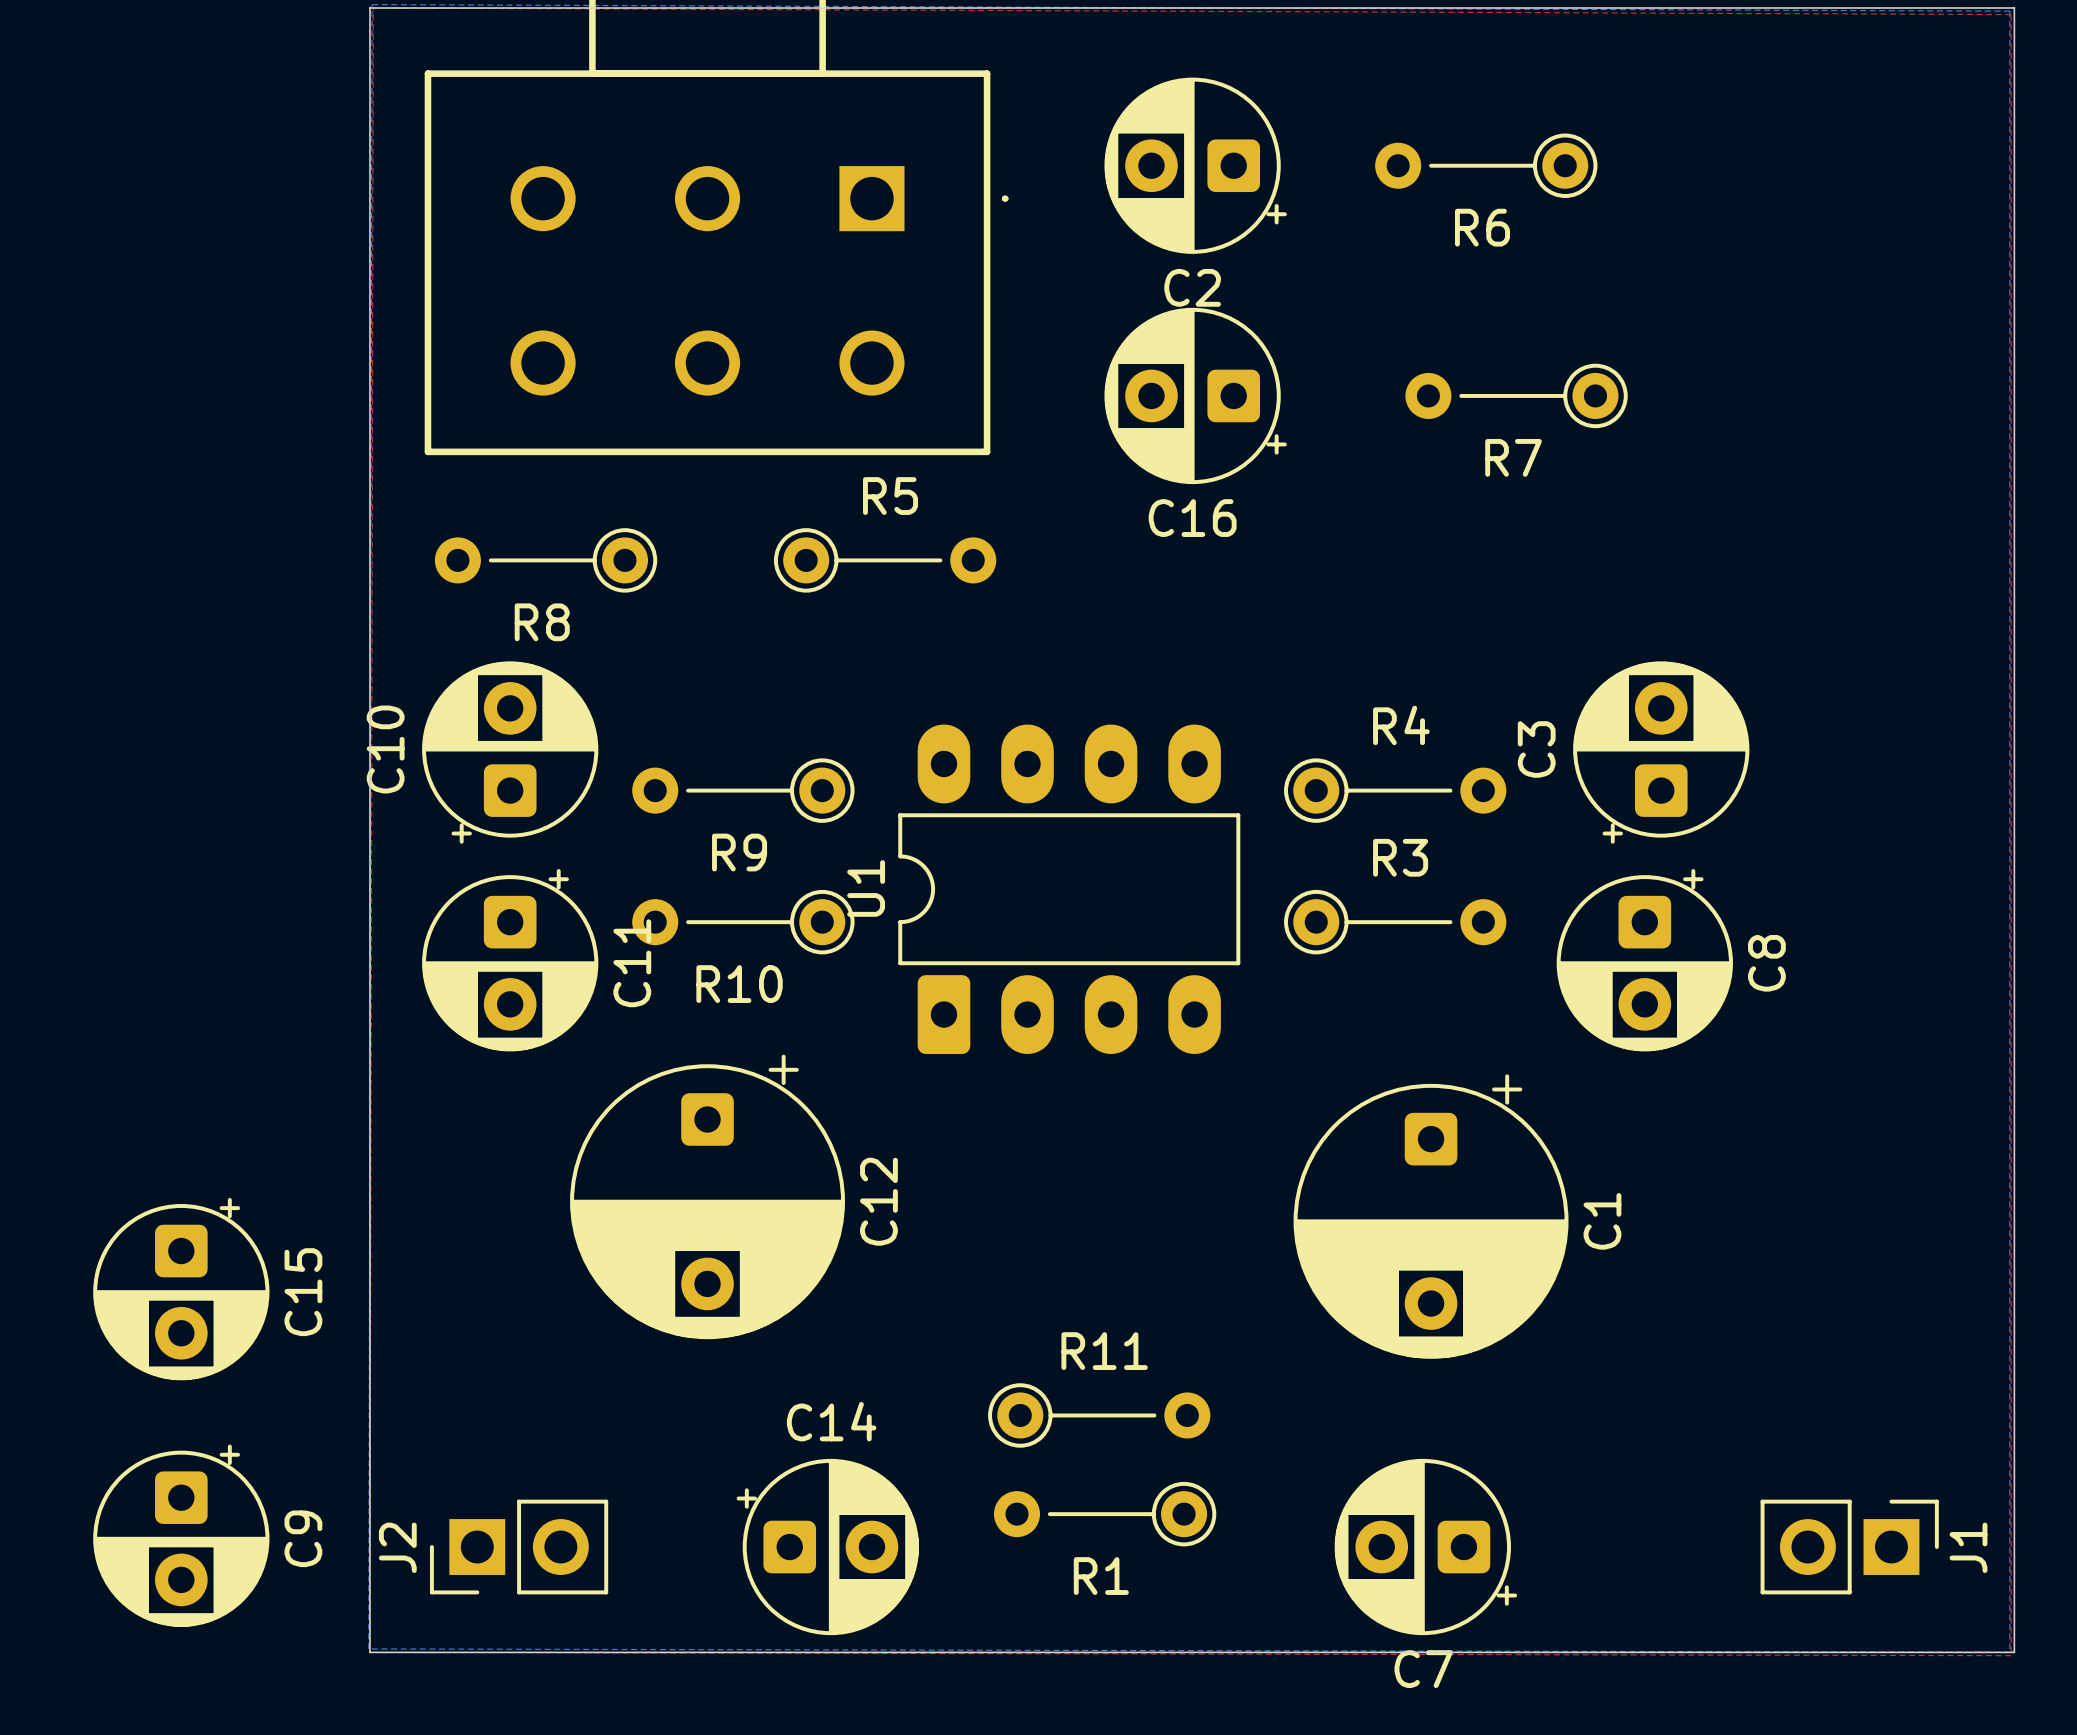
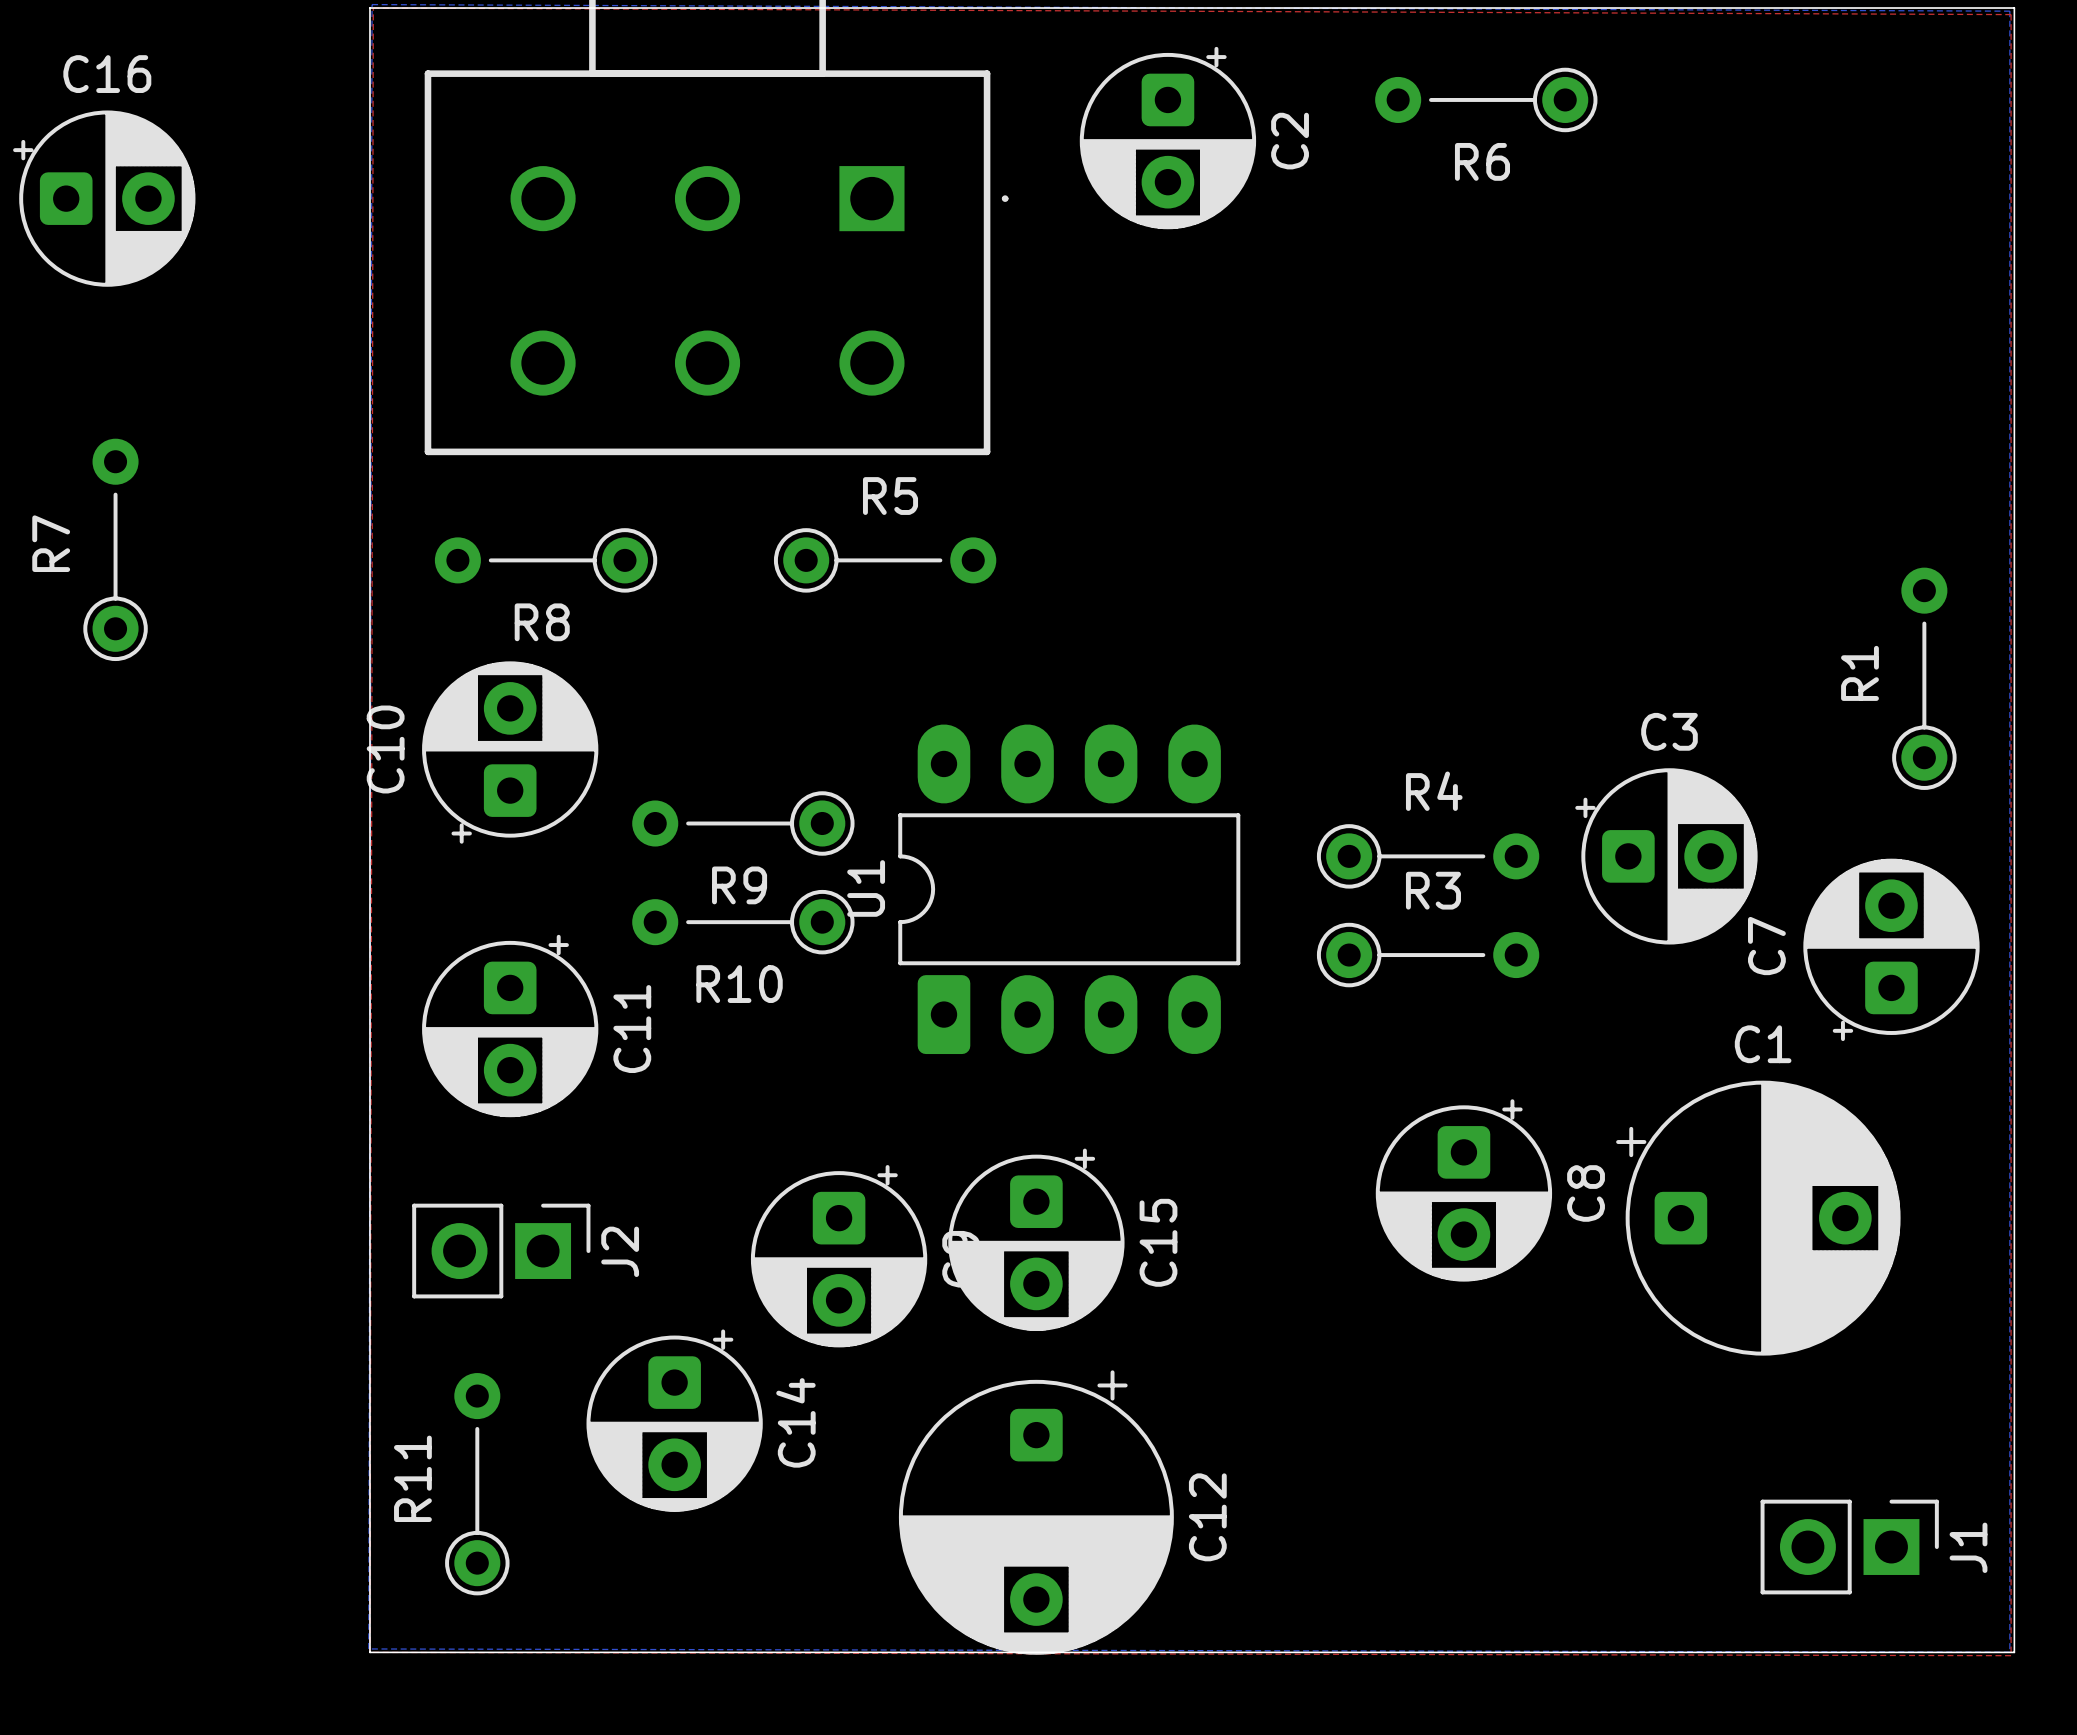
C2 rotation: 0° (1195, 165) -> 90° counterclockwise (1167, 138)
R6 position: (1486, 165) -> (1486, 99)
C16 rotation: 0° (1195, 395) -> 180° (104, 198)
C16 position: (1195, 395) -> (104, 198)
R7 rotation: 0° (1516, 395) -> 90° clockwise (115, 549)
R7 position: (1516, 395) -> (115, 549)
C3 rotation: 0° (1661, 752) -> 90° clockwise (1666, 856)
R9 position: (743, 790) -> (743, 823)
R4 position: (1395, 790) -> (1428, 856)
R3 position: (1395, 922) -> (1428, 955)
C11 position: (510, 960) -> (510, 1026)
C8 position: (1644, 960) -> (1463, 1190)
C12 position: (707, 1196) -> (1036, 1512)
C1 rotation: 0° (1431, 1216) -> 90° counterclockwise (1758, 1218)
C1 position: (1431, 1216) -> (1758, 1218)
C15 position: (181, 1289) -> (1036, 1239)
R11 rotation: 0° (1099, 1415) -> 90° counterclockwise (477, 1484)
R11 position: (1099, 1415) -> (477, 1484)
R1 rotation: 0° (1105, 1514) -> 90° clockwise (1924, 678)
R1 position: (1105, 1514) -> (1924, 678)
C9 position: (181, 1535) -> (839, 1256)
J2 rotation: 0° (519, 1547) -> 180° (501, 1251)
J2 position: (519, 1547) -> (501, 1251)
C14 rotation: 0° (827, 1547) -> 90° clockwise (674, 1420)
C14 position: (827, 1547) -> (674, 1420)
C7 rotation: 0° (1425, 1547) -> 90° clockwise (1891, 949)
C7 position: (1425, 1547) -> (1891, 949)

